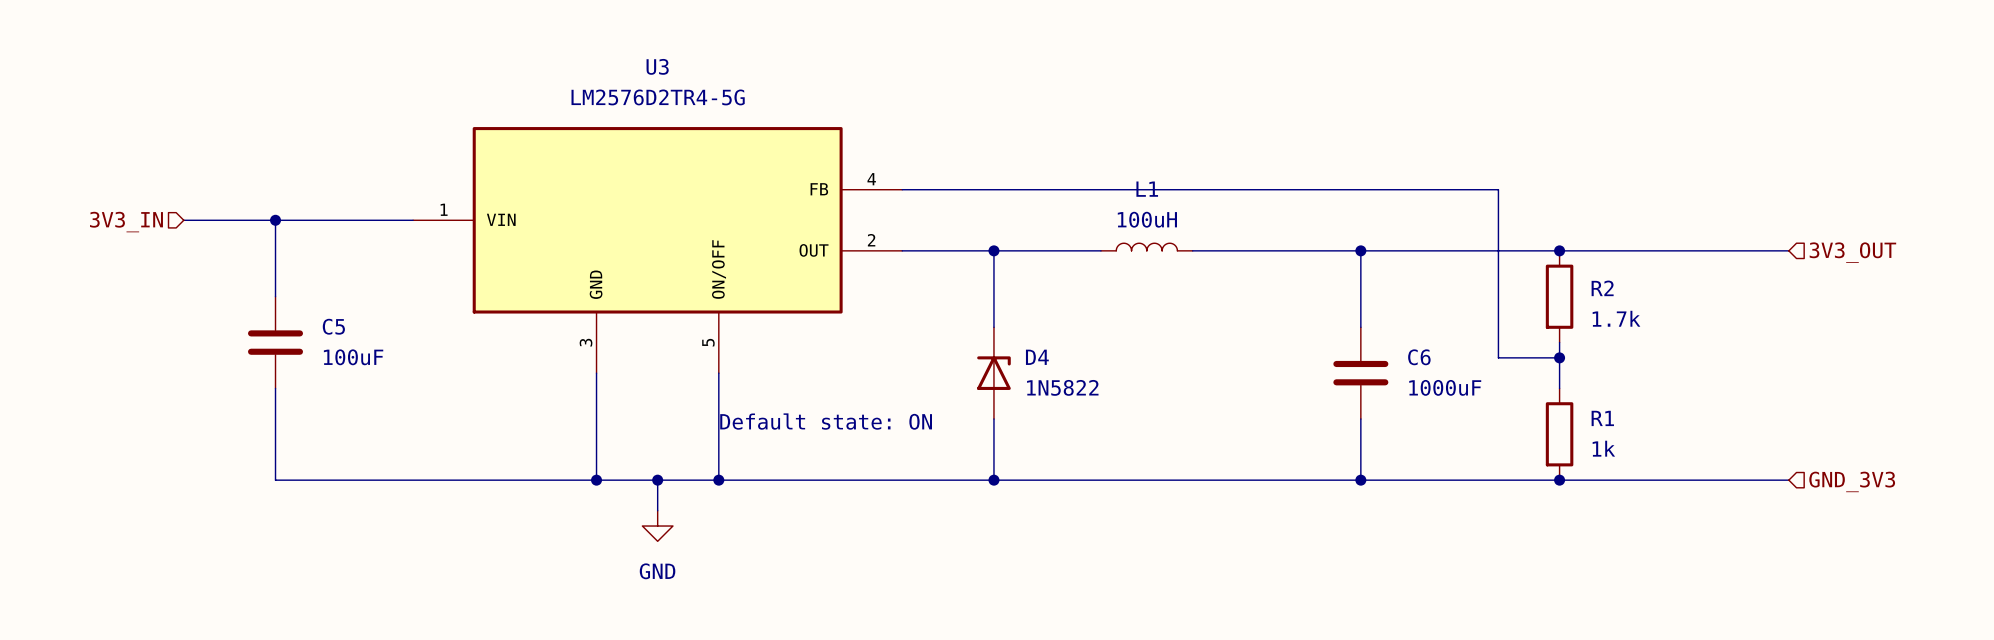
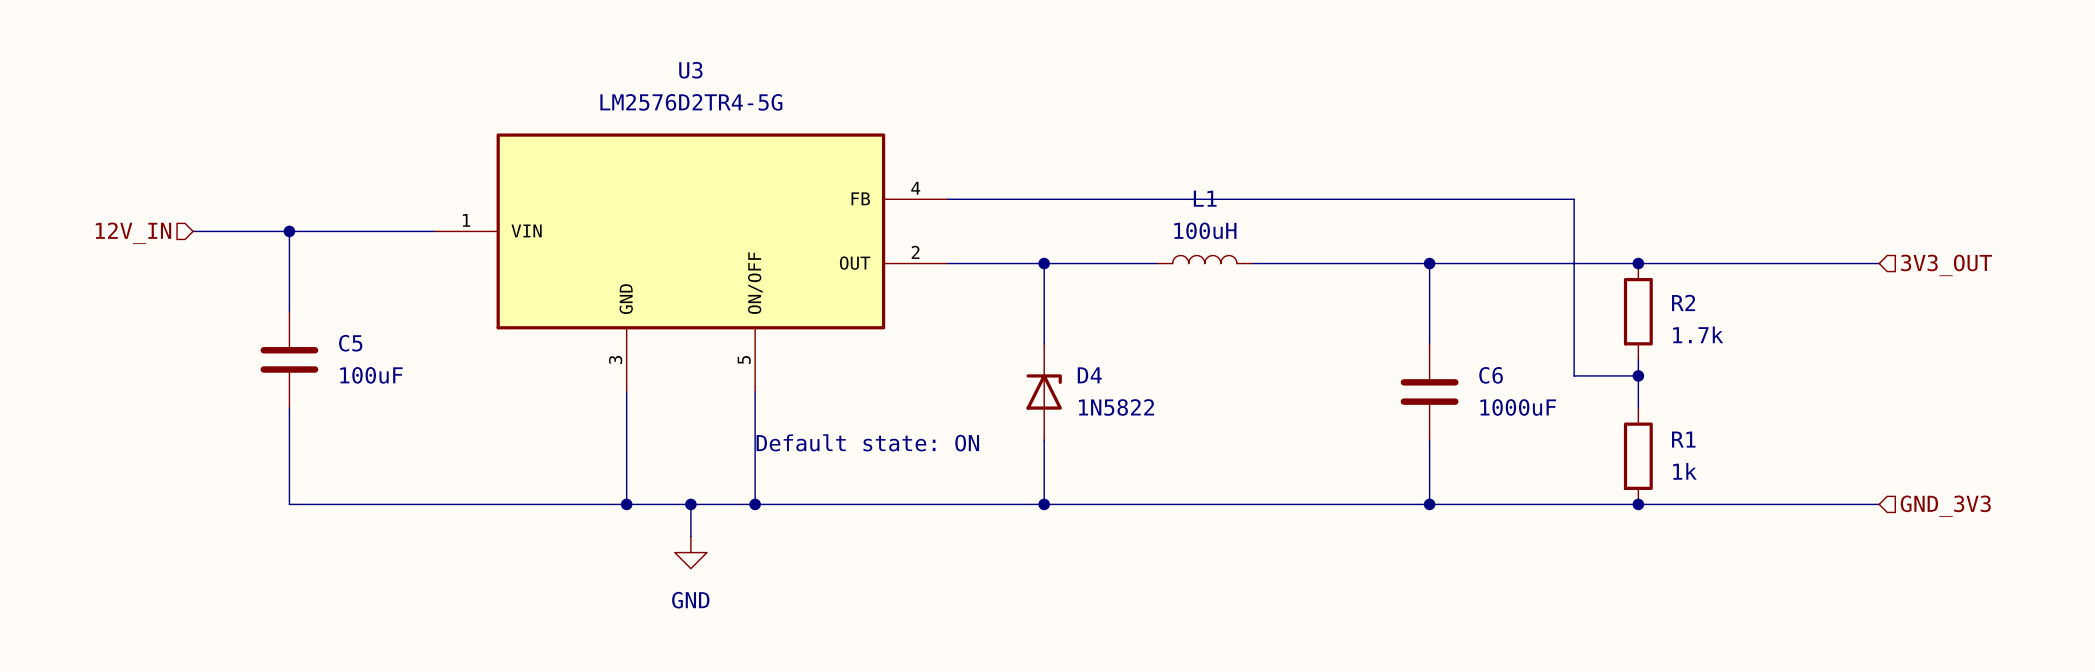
hierarchical label: 3V3_IN (126, 222) -> 12V_IN (133, 233)

